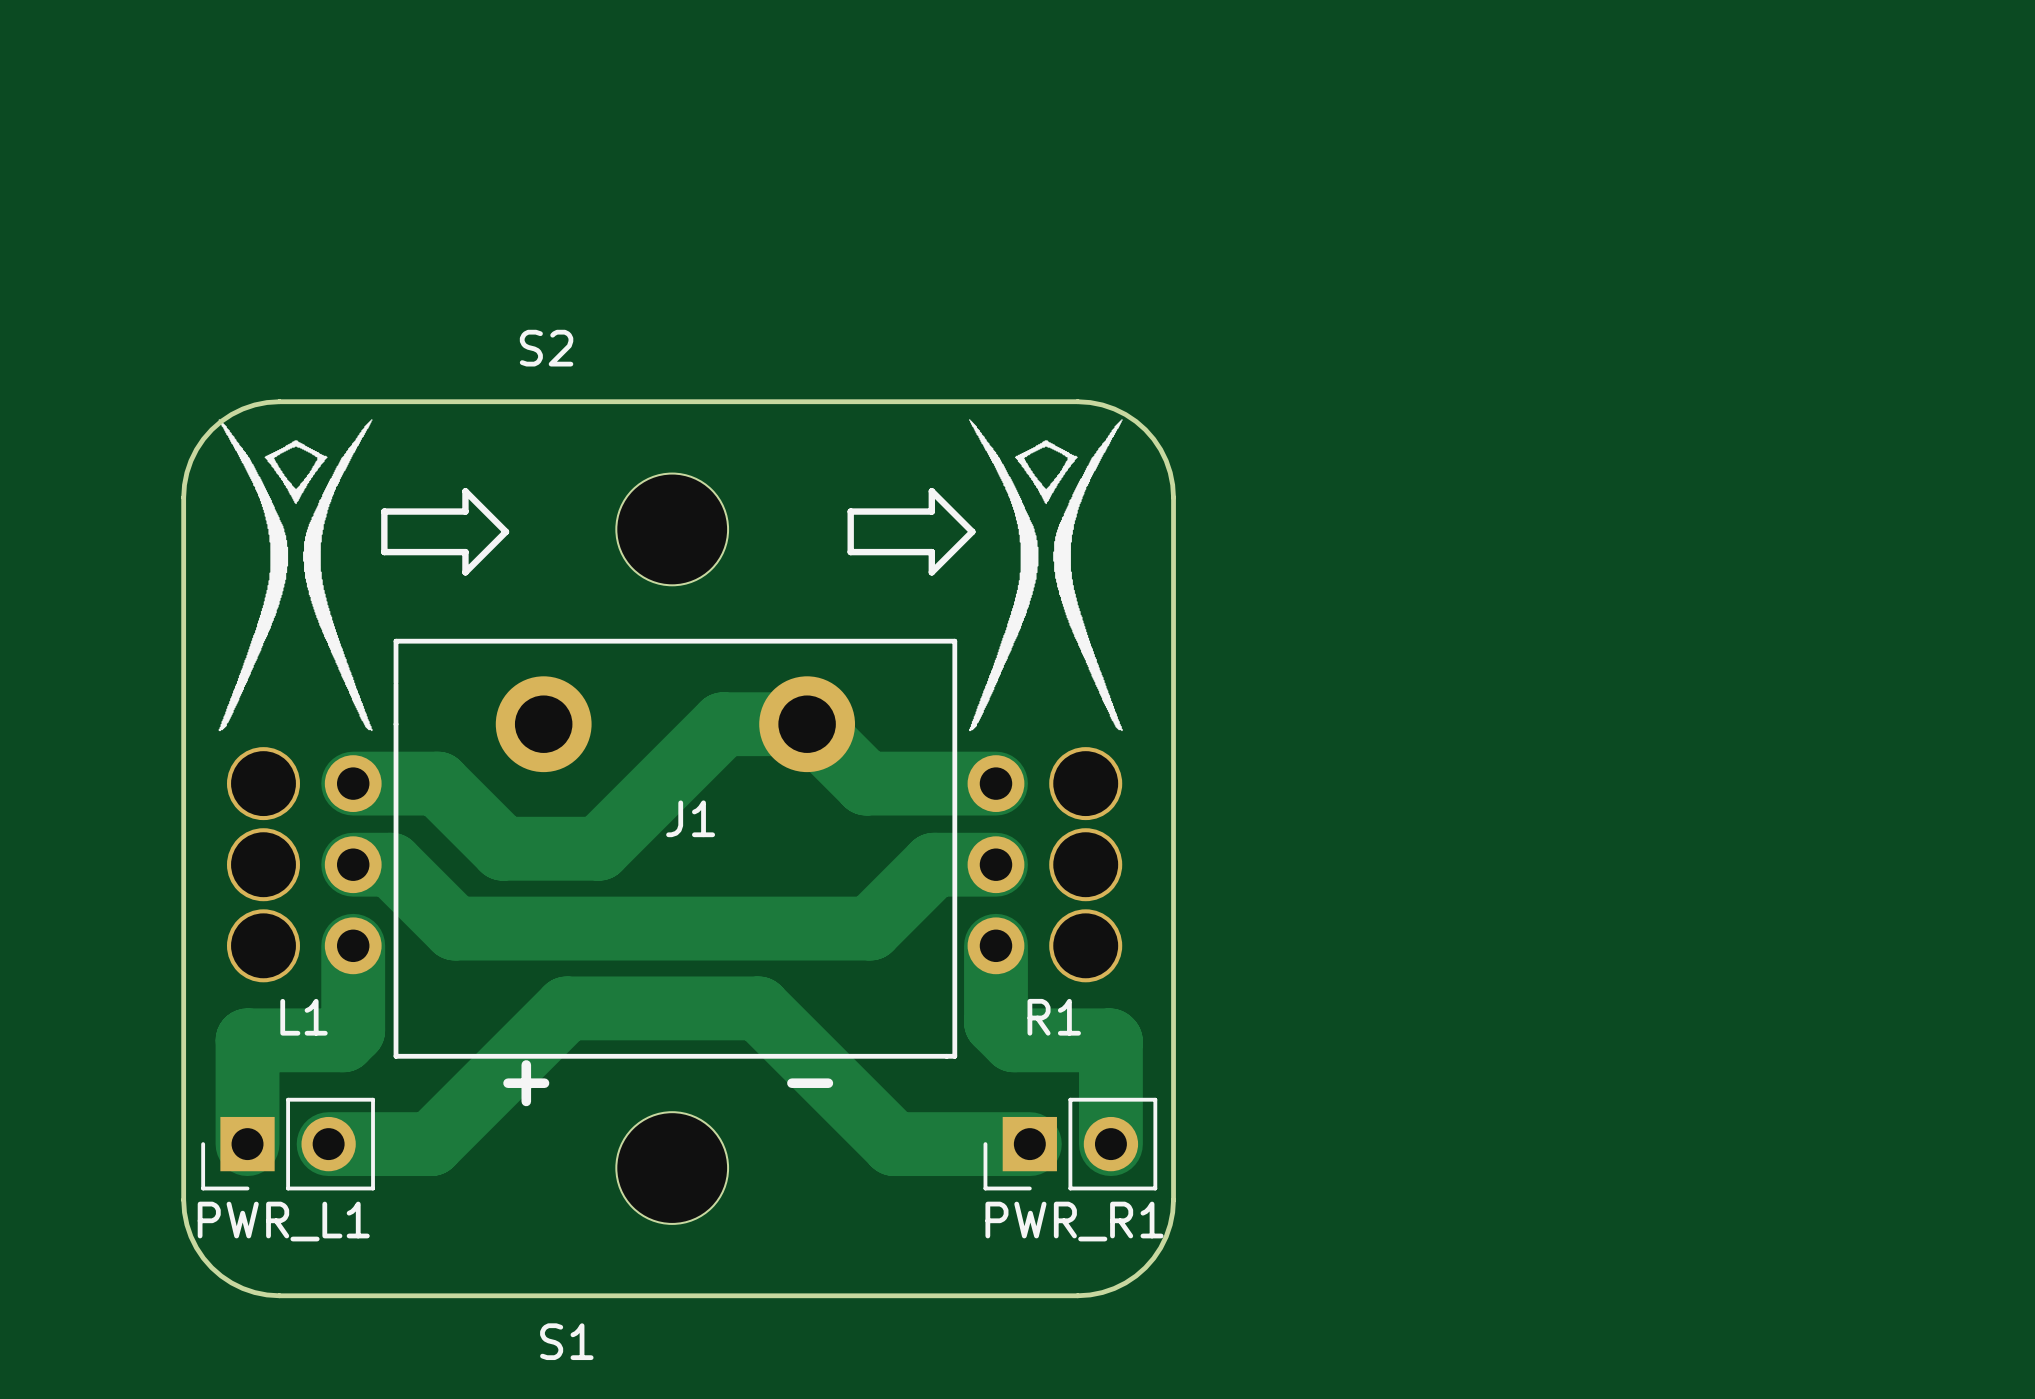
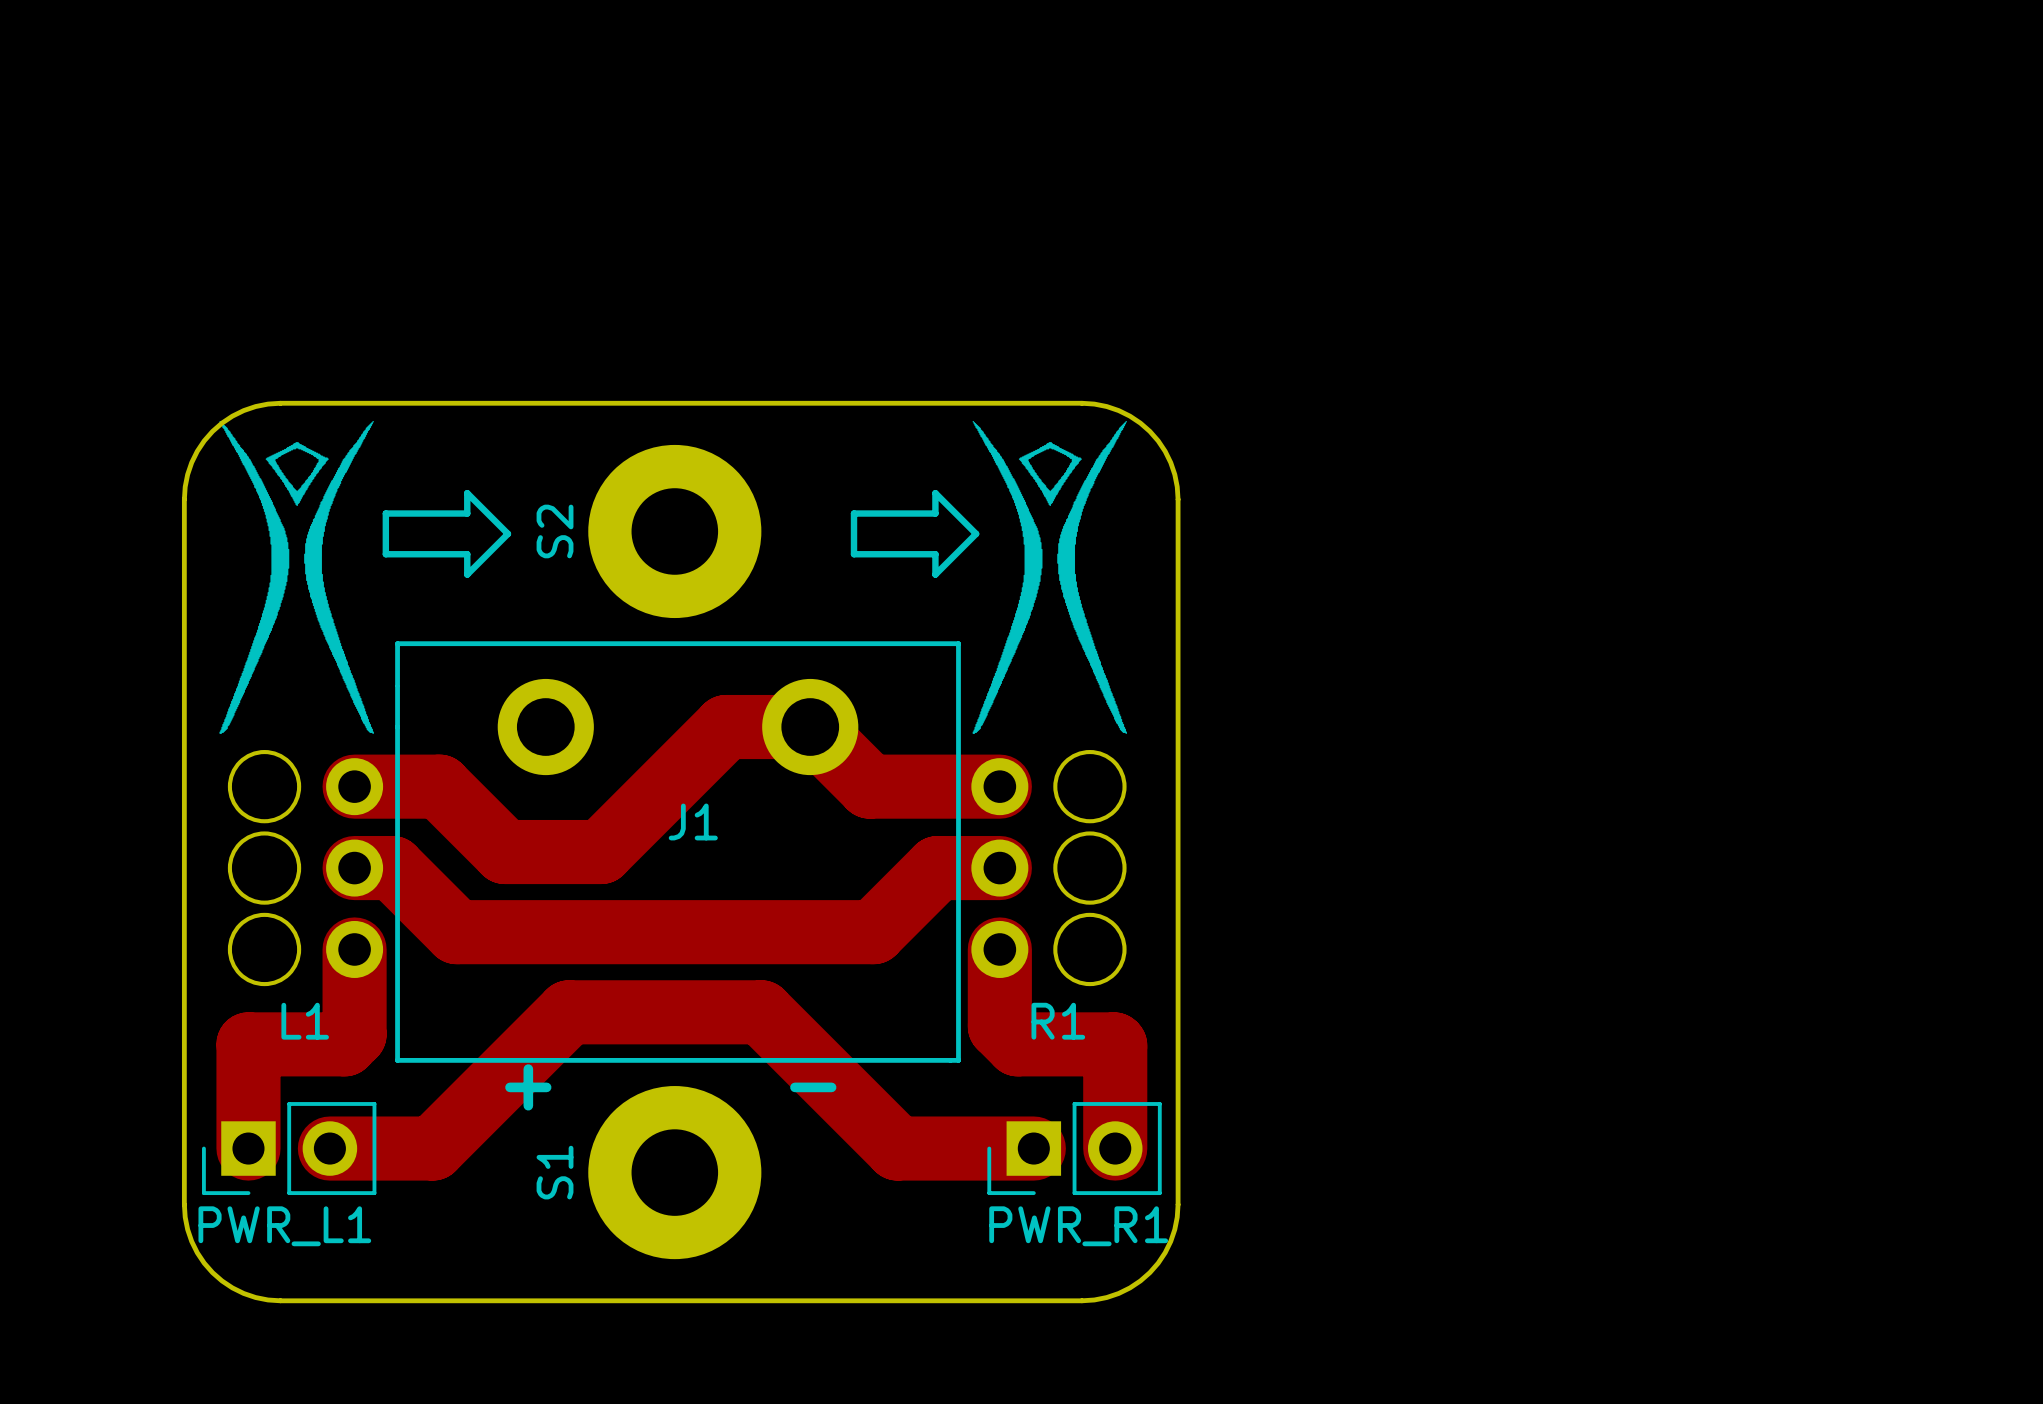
S2 name position: S2 (546, 348) -> S2 (555, 531)
S2 footprint: [616, 473, 729, 586] -> [588, 444, 762, 619]
S1 footprint: [616, 1112, 729, 1224] -> [588, 1086, 762, 1260]
S1 name position: S1 (566, 1341) -> S1 (555, 1172)

